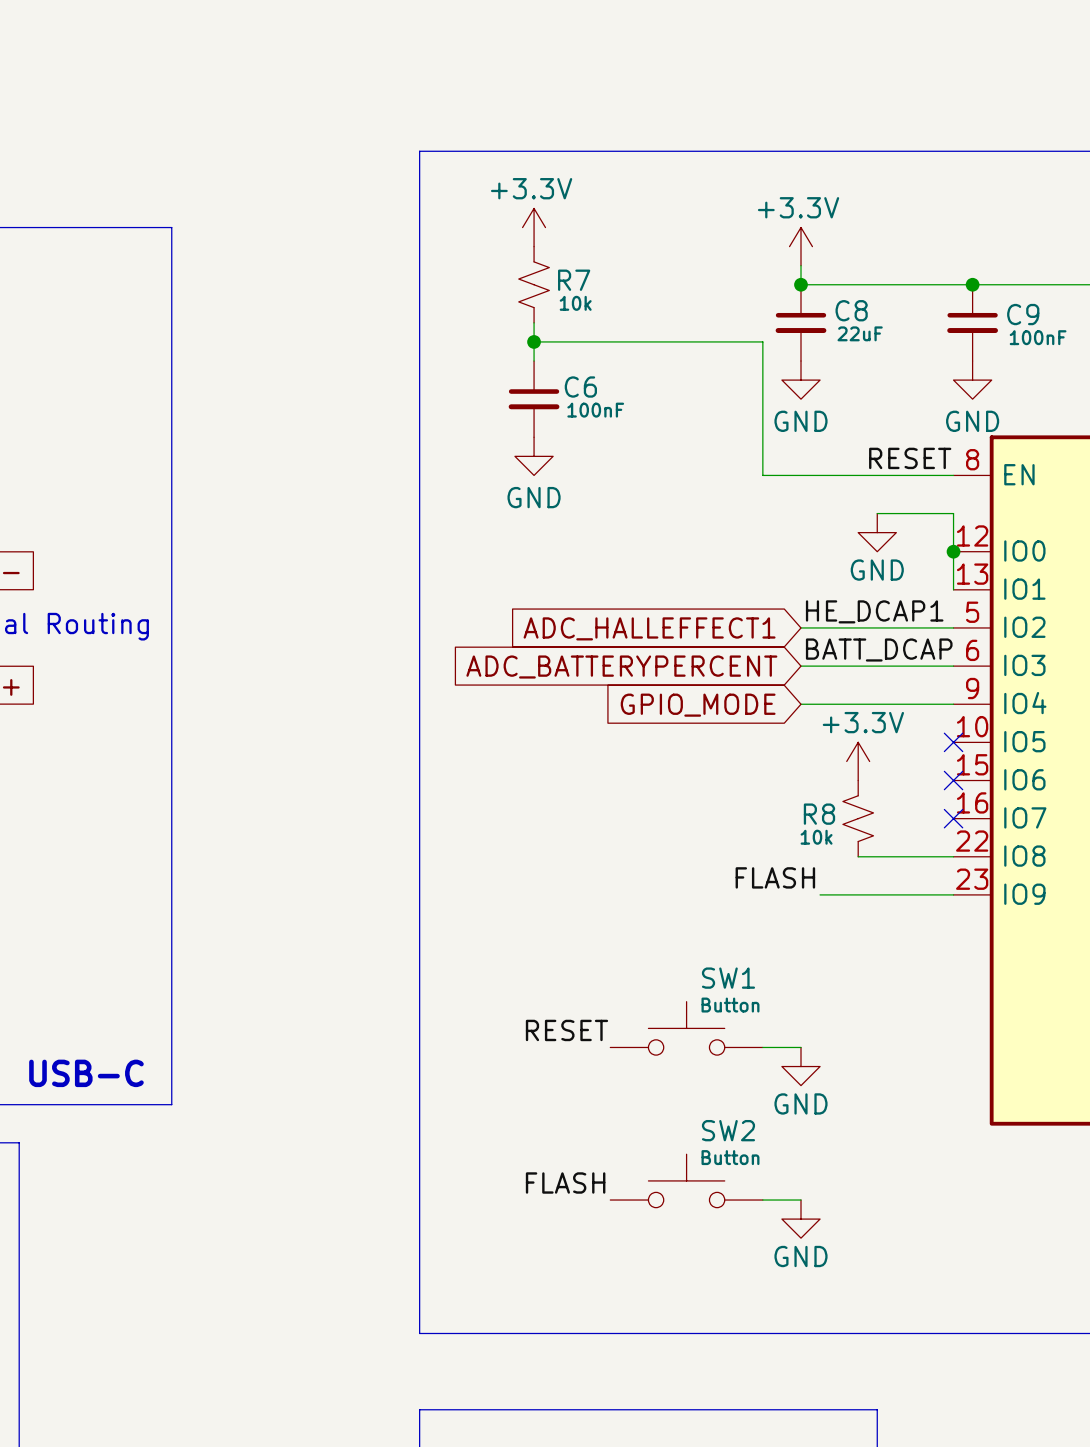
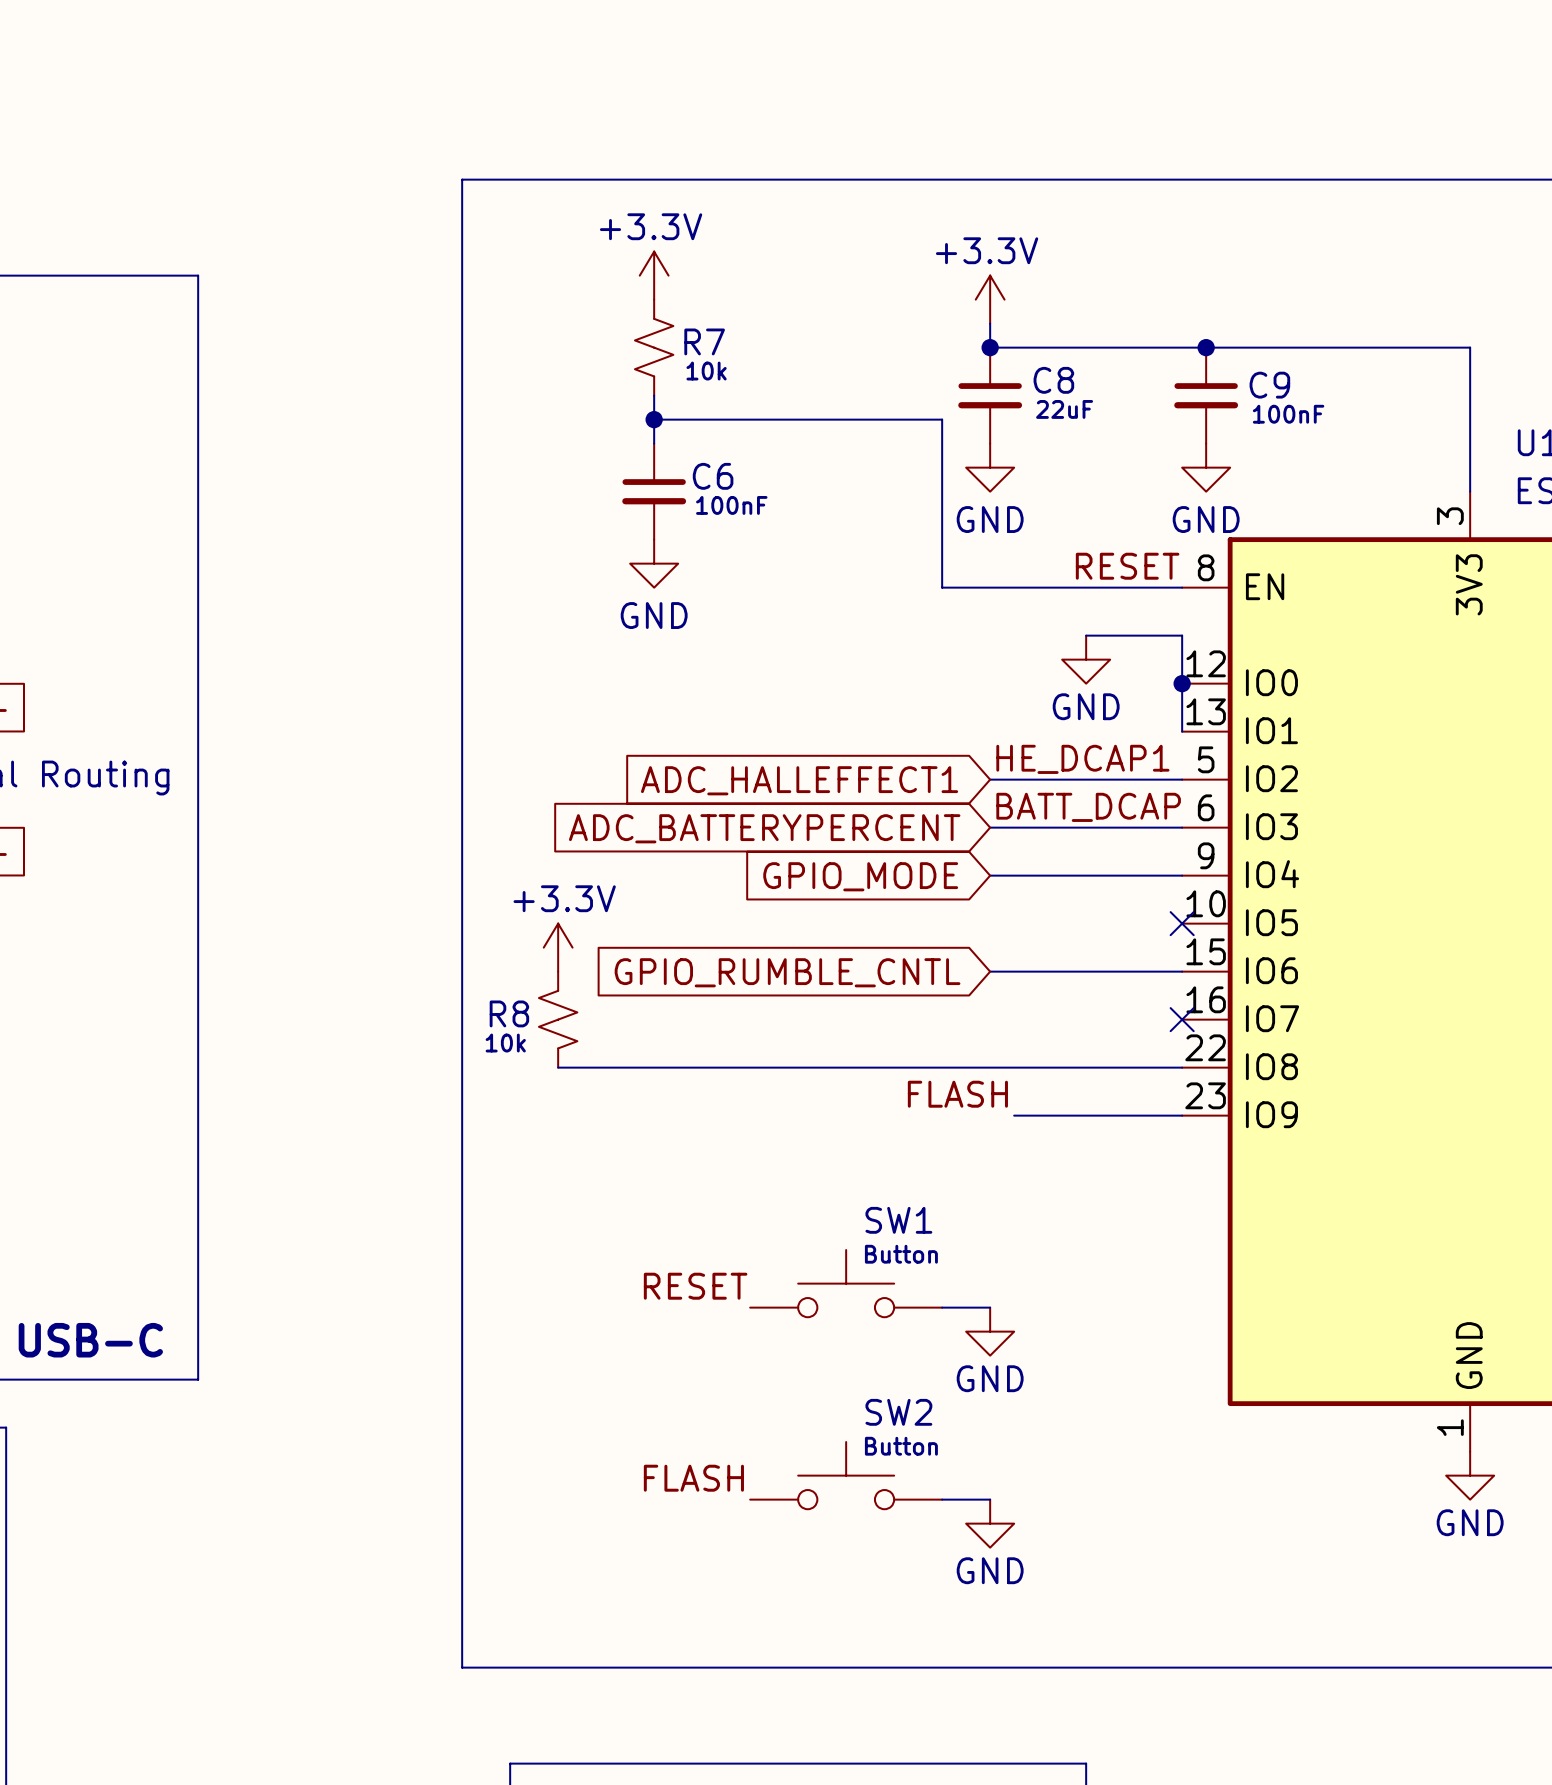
line: (419, 151) (419, 1333) -> (510, 179) (462, 179) (462, 1667) (510, 1667)
power symbol: none -> +3.3V (558, 947)
power symbol: +3.3V (858, 761) -> none
wire: none -> (990, 971) (1182, 971)
no-connect mark: (953, 780) -> none
global label: none -> GPIO_RUMBLE_CNTL (787, 972)
R8 position: (858, 818) -> (558, 1019)
wire: none -> (558, 1067) (1062, 1067)

